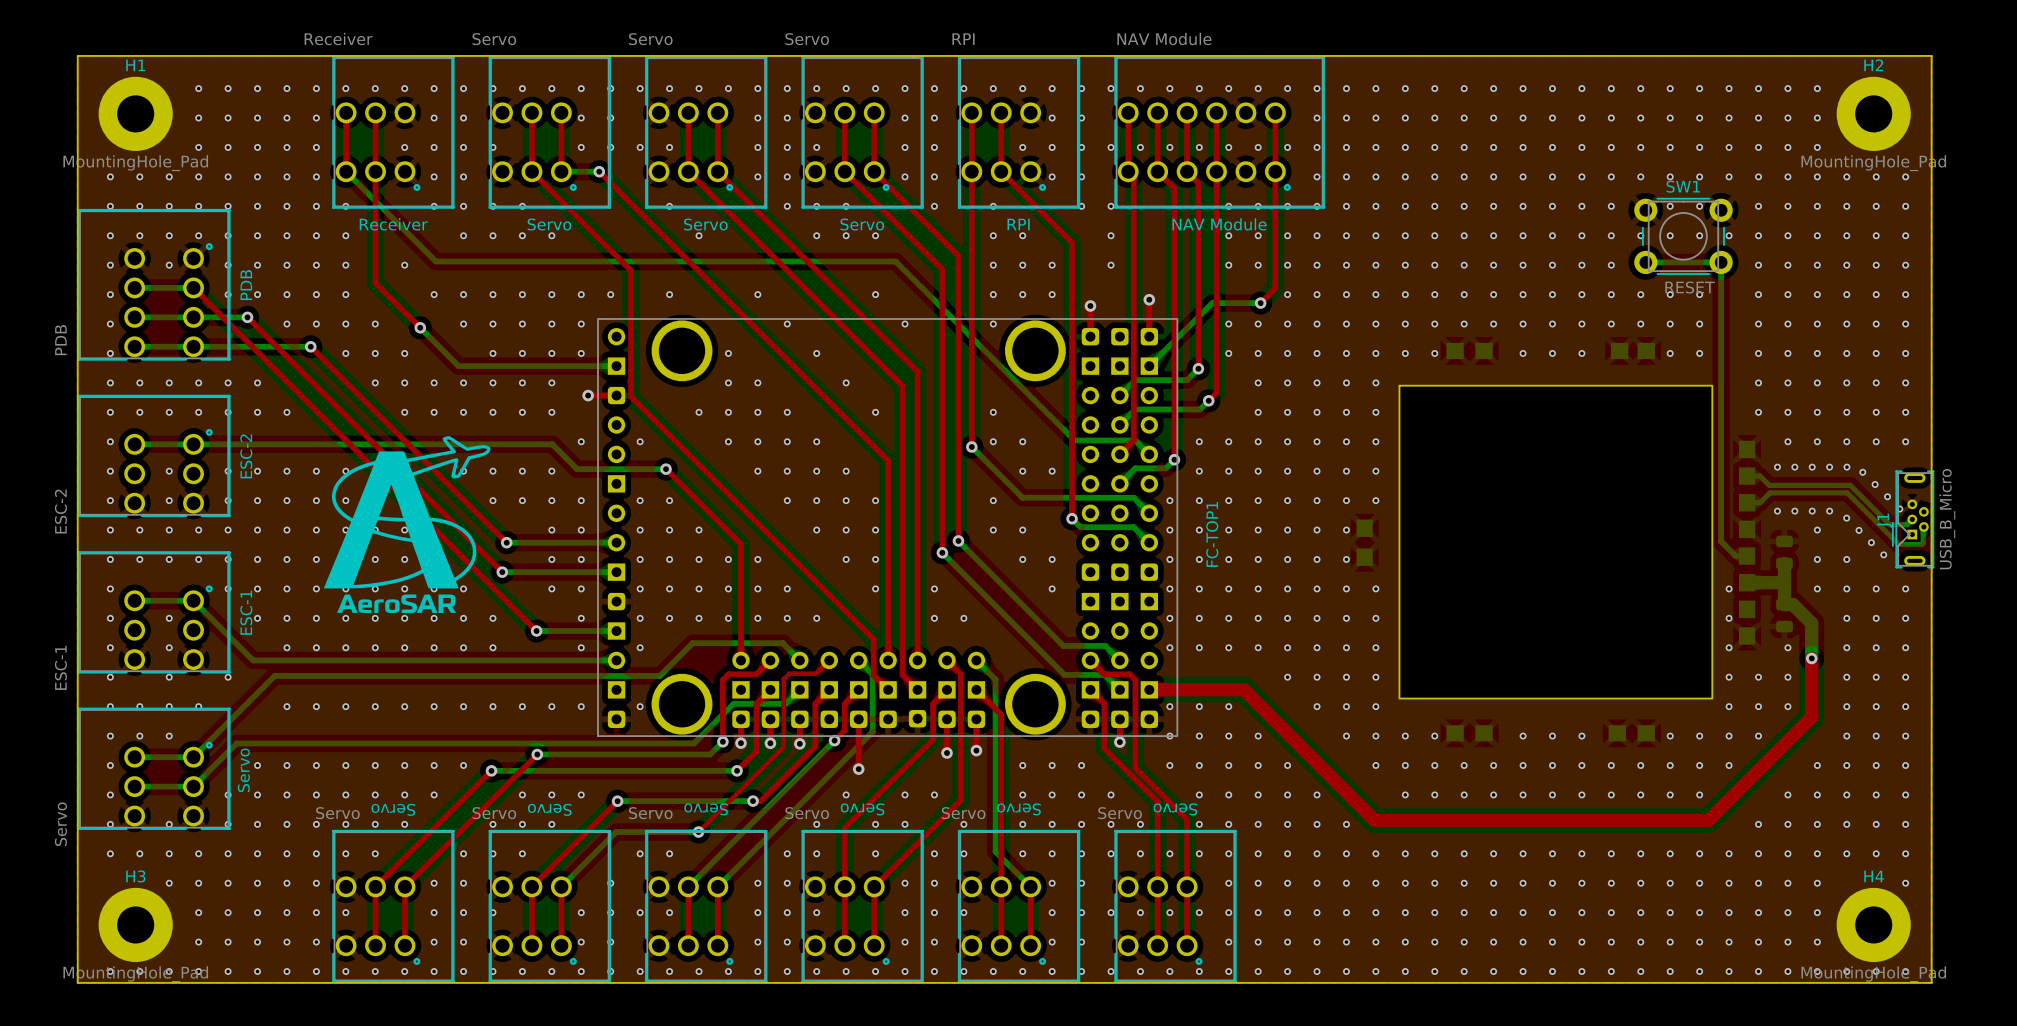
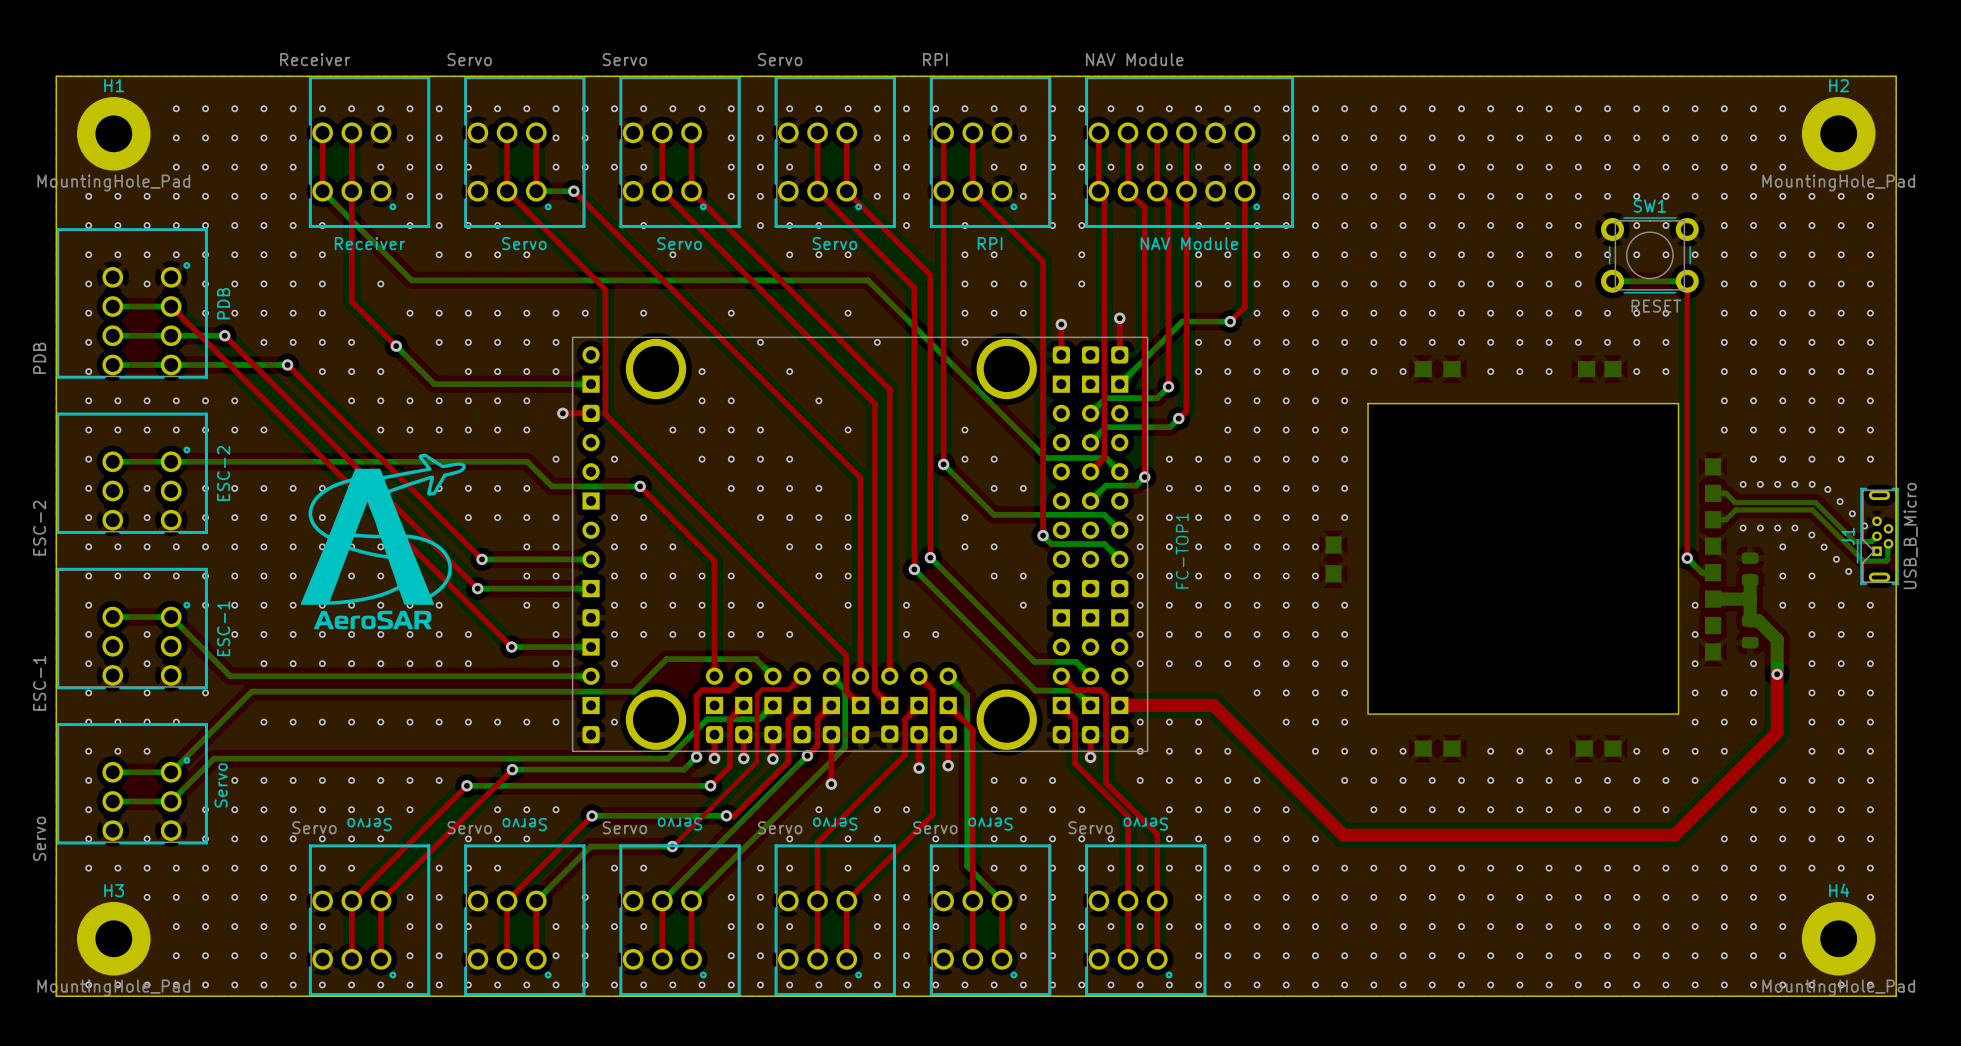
top track: none -> (1687, 281) (1687, 558)
bottom track: (1721, 262) (1721, 541) -> none
via: none -> (1687, 558)

